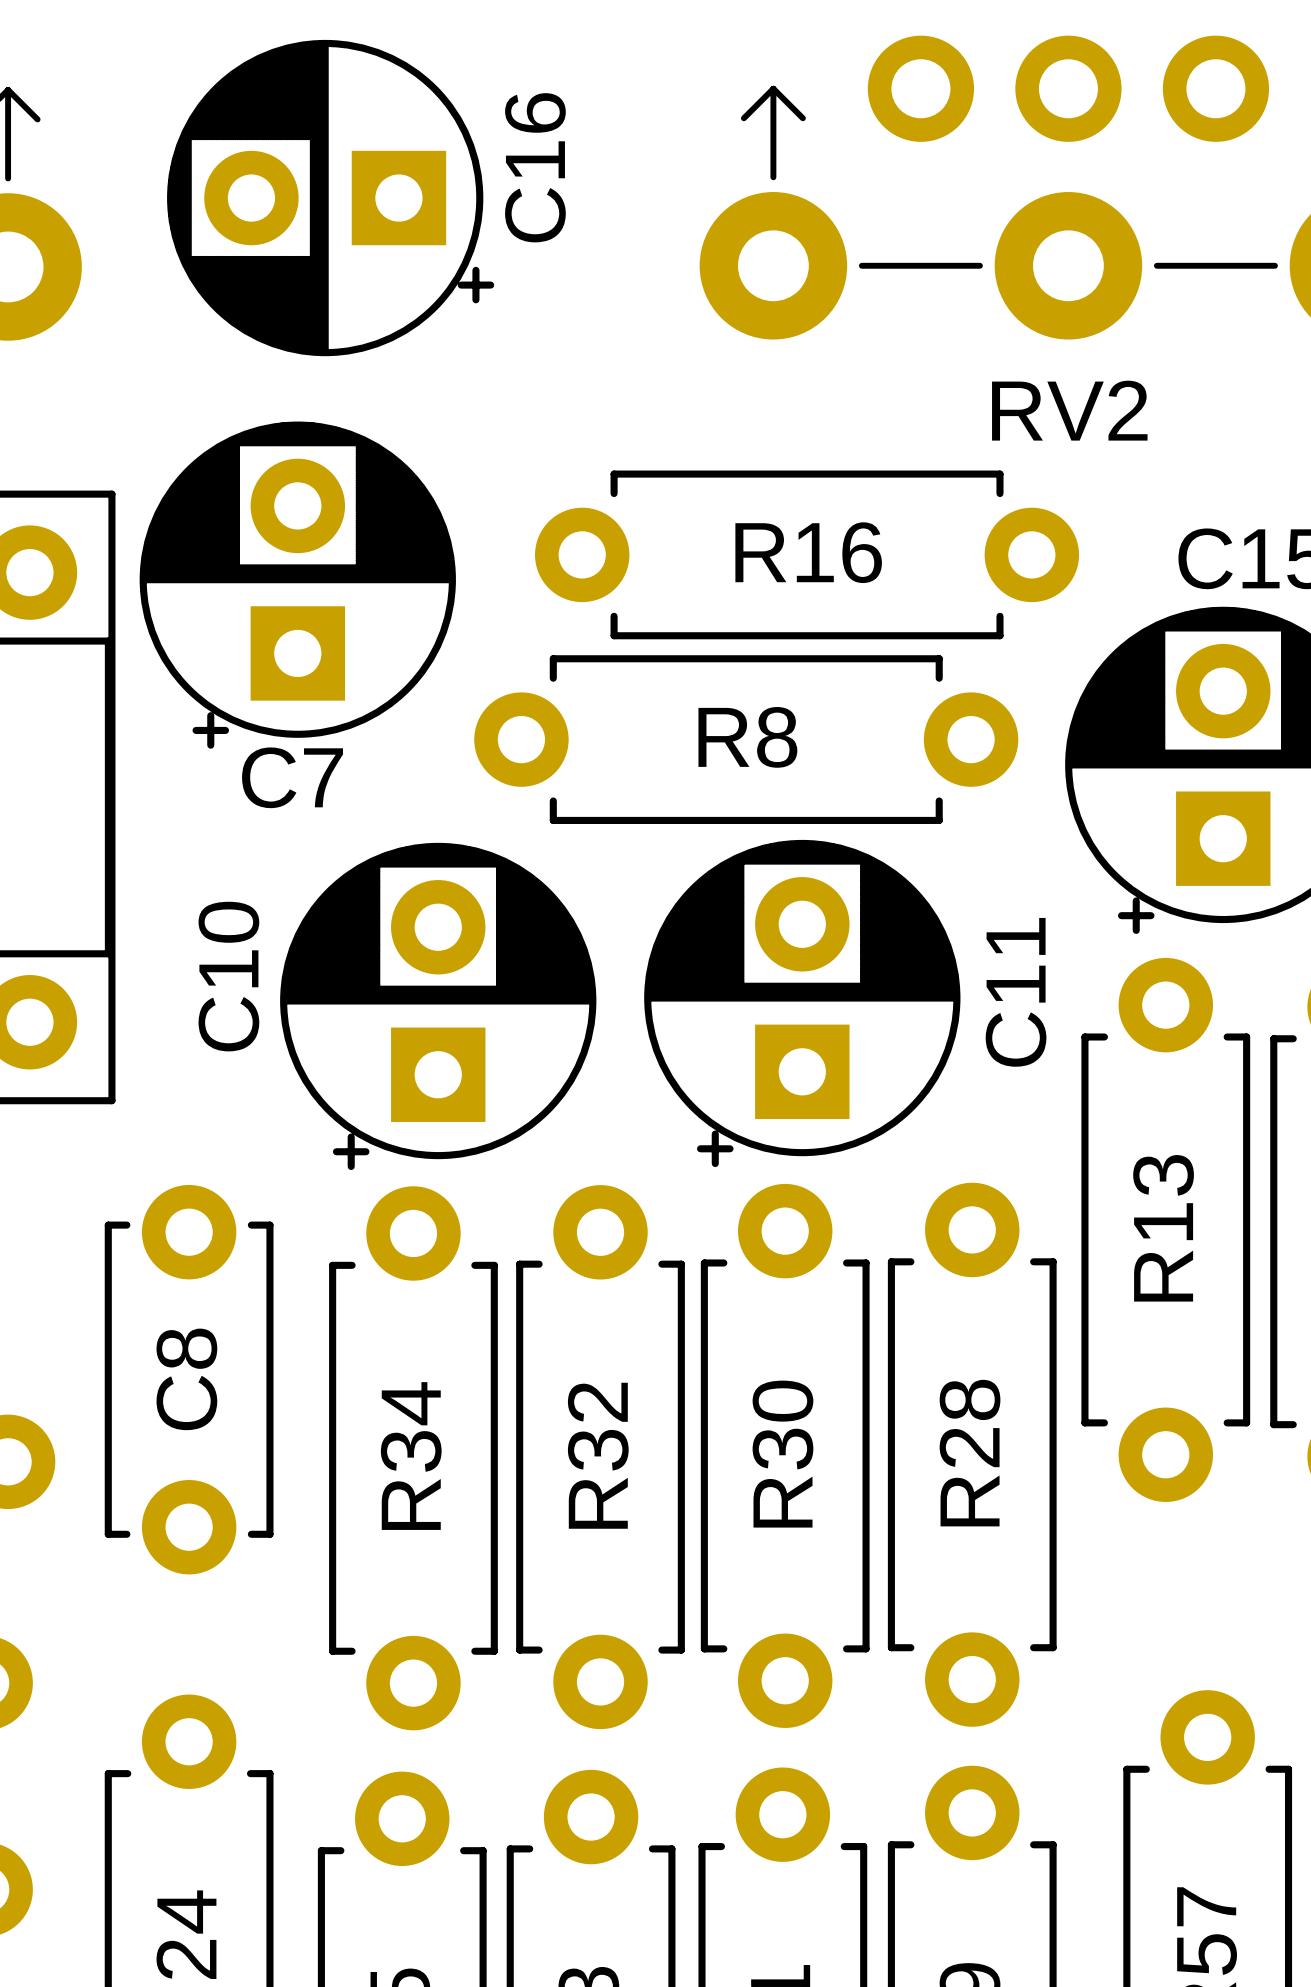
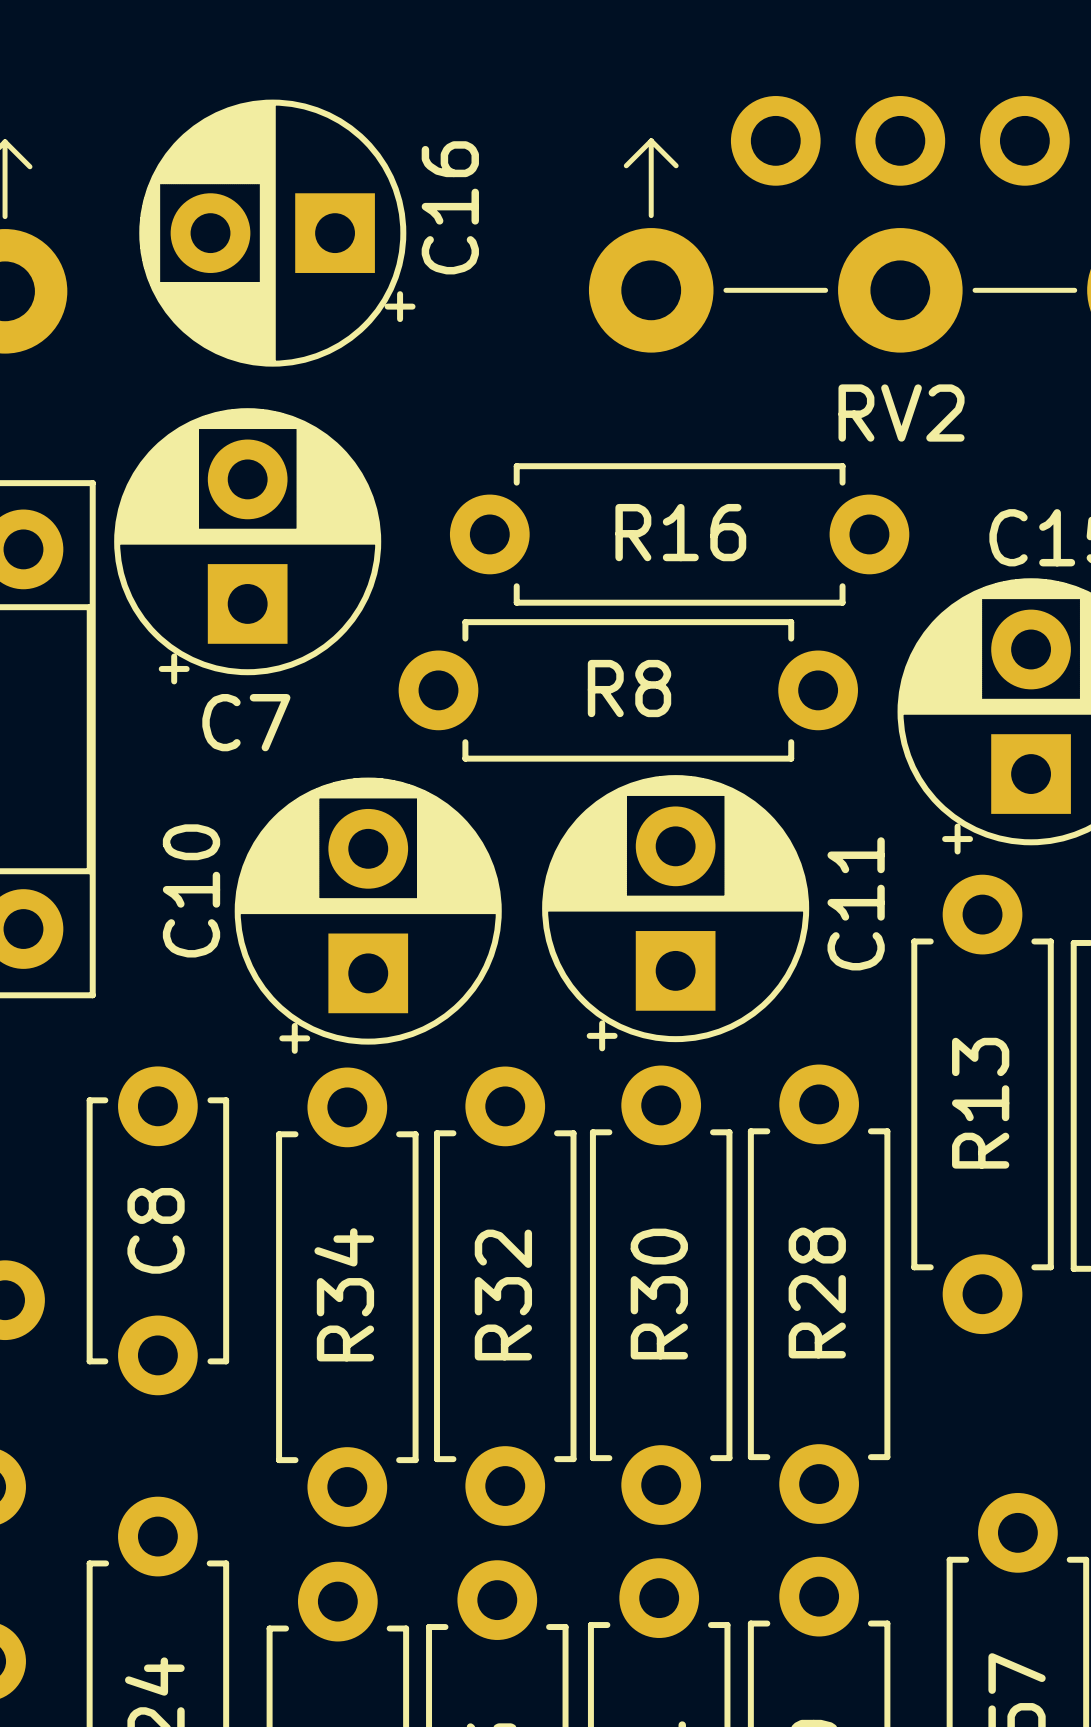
C7 position: (297, 585) -> (247, 546)

